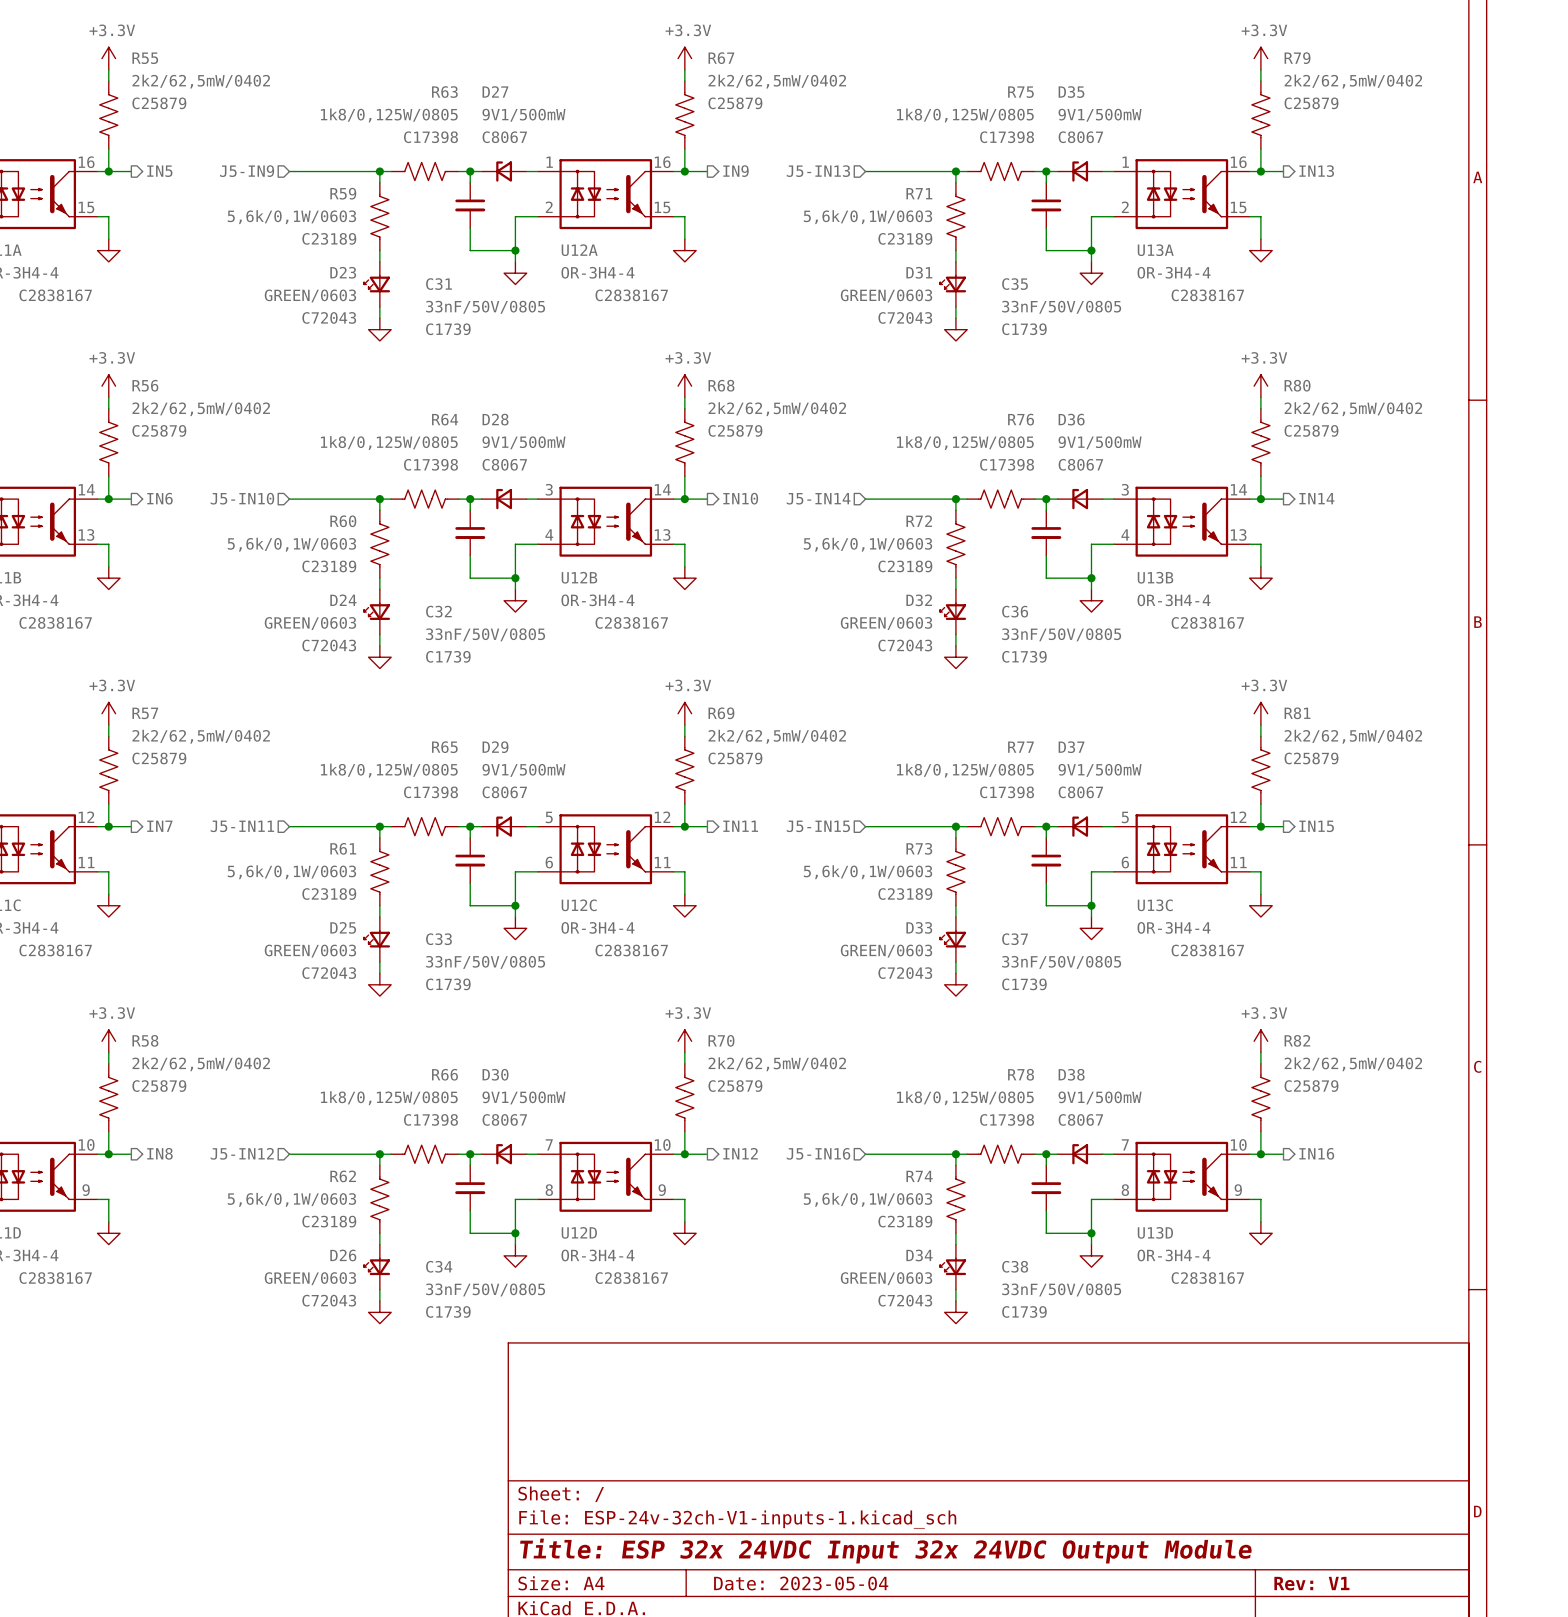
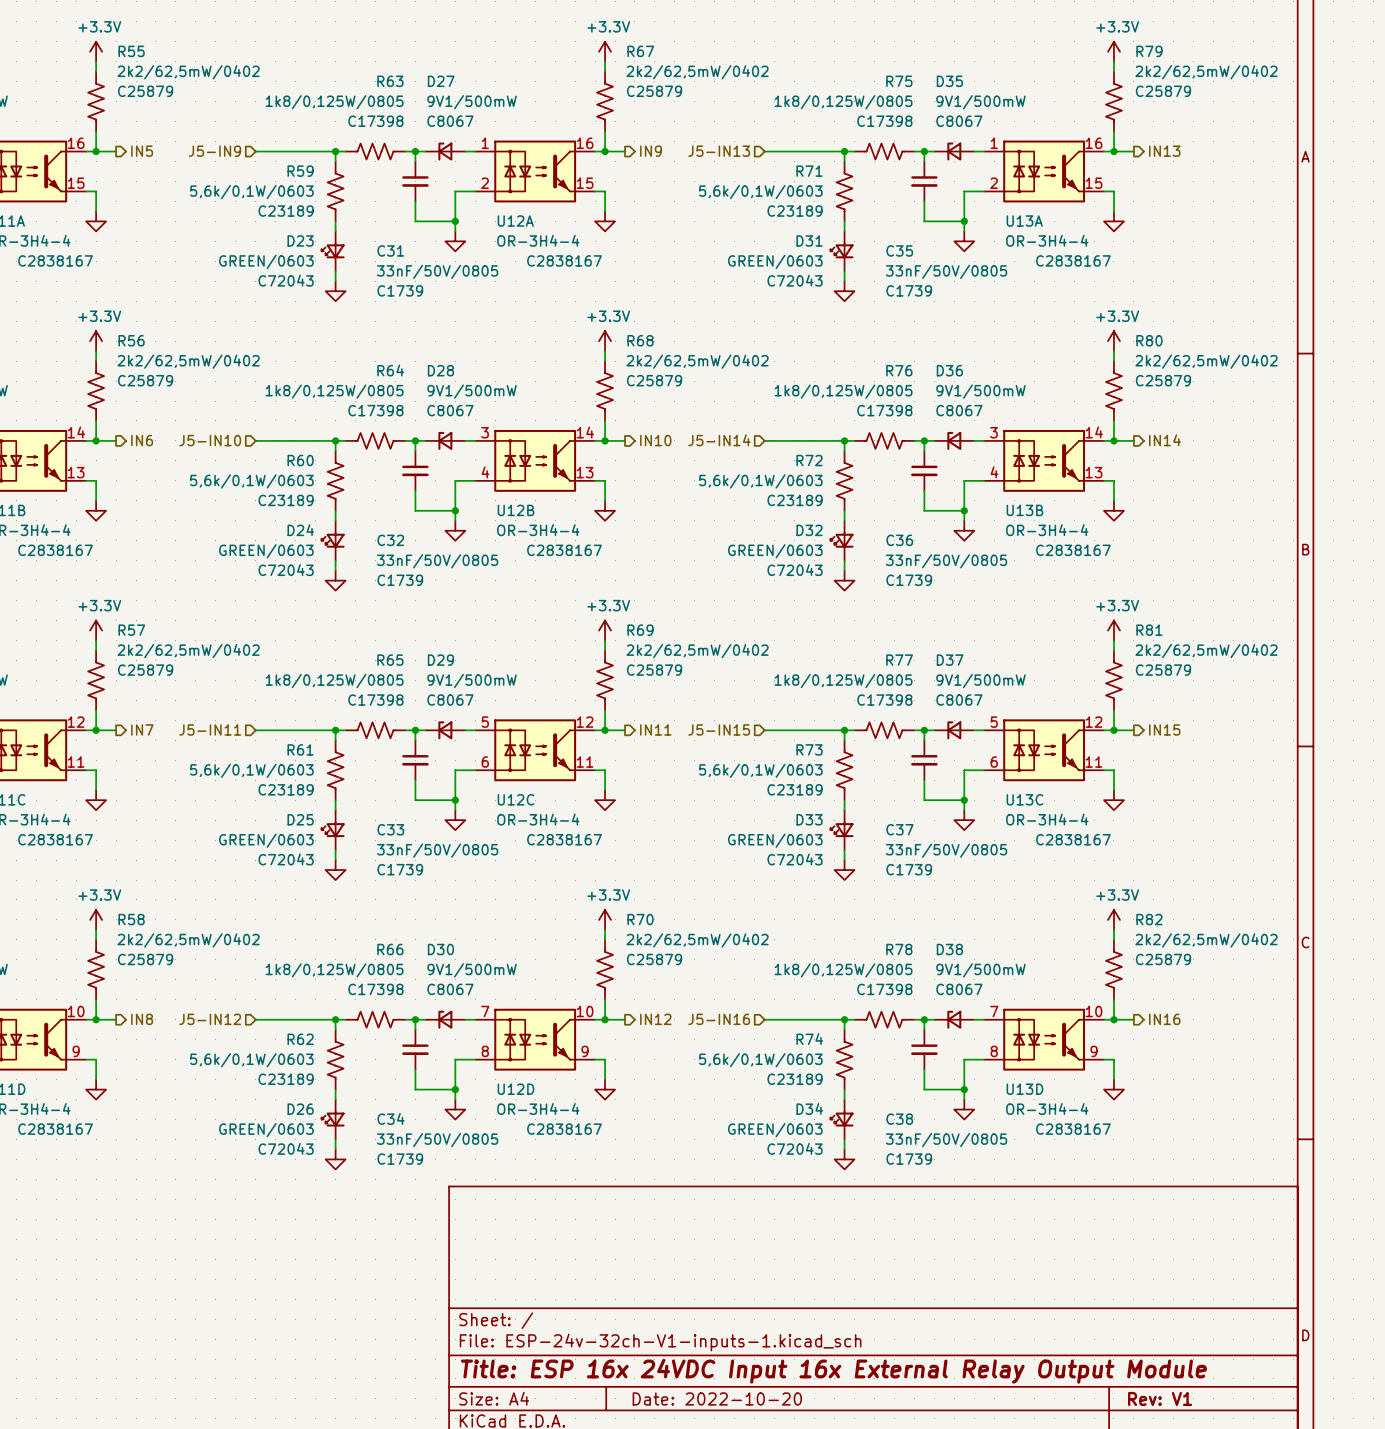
title block: Title: ESP 32x 24VDC Input 32x 24VDC Output Module (886, 1551) -> Title: ESP 16x 24VDC Input 16x External Relay Output Module (833, 1371)
title block: Date: 2023-05-04 (801, 1583) -> Date: 2022-10-20 (717, 1398)

